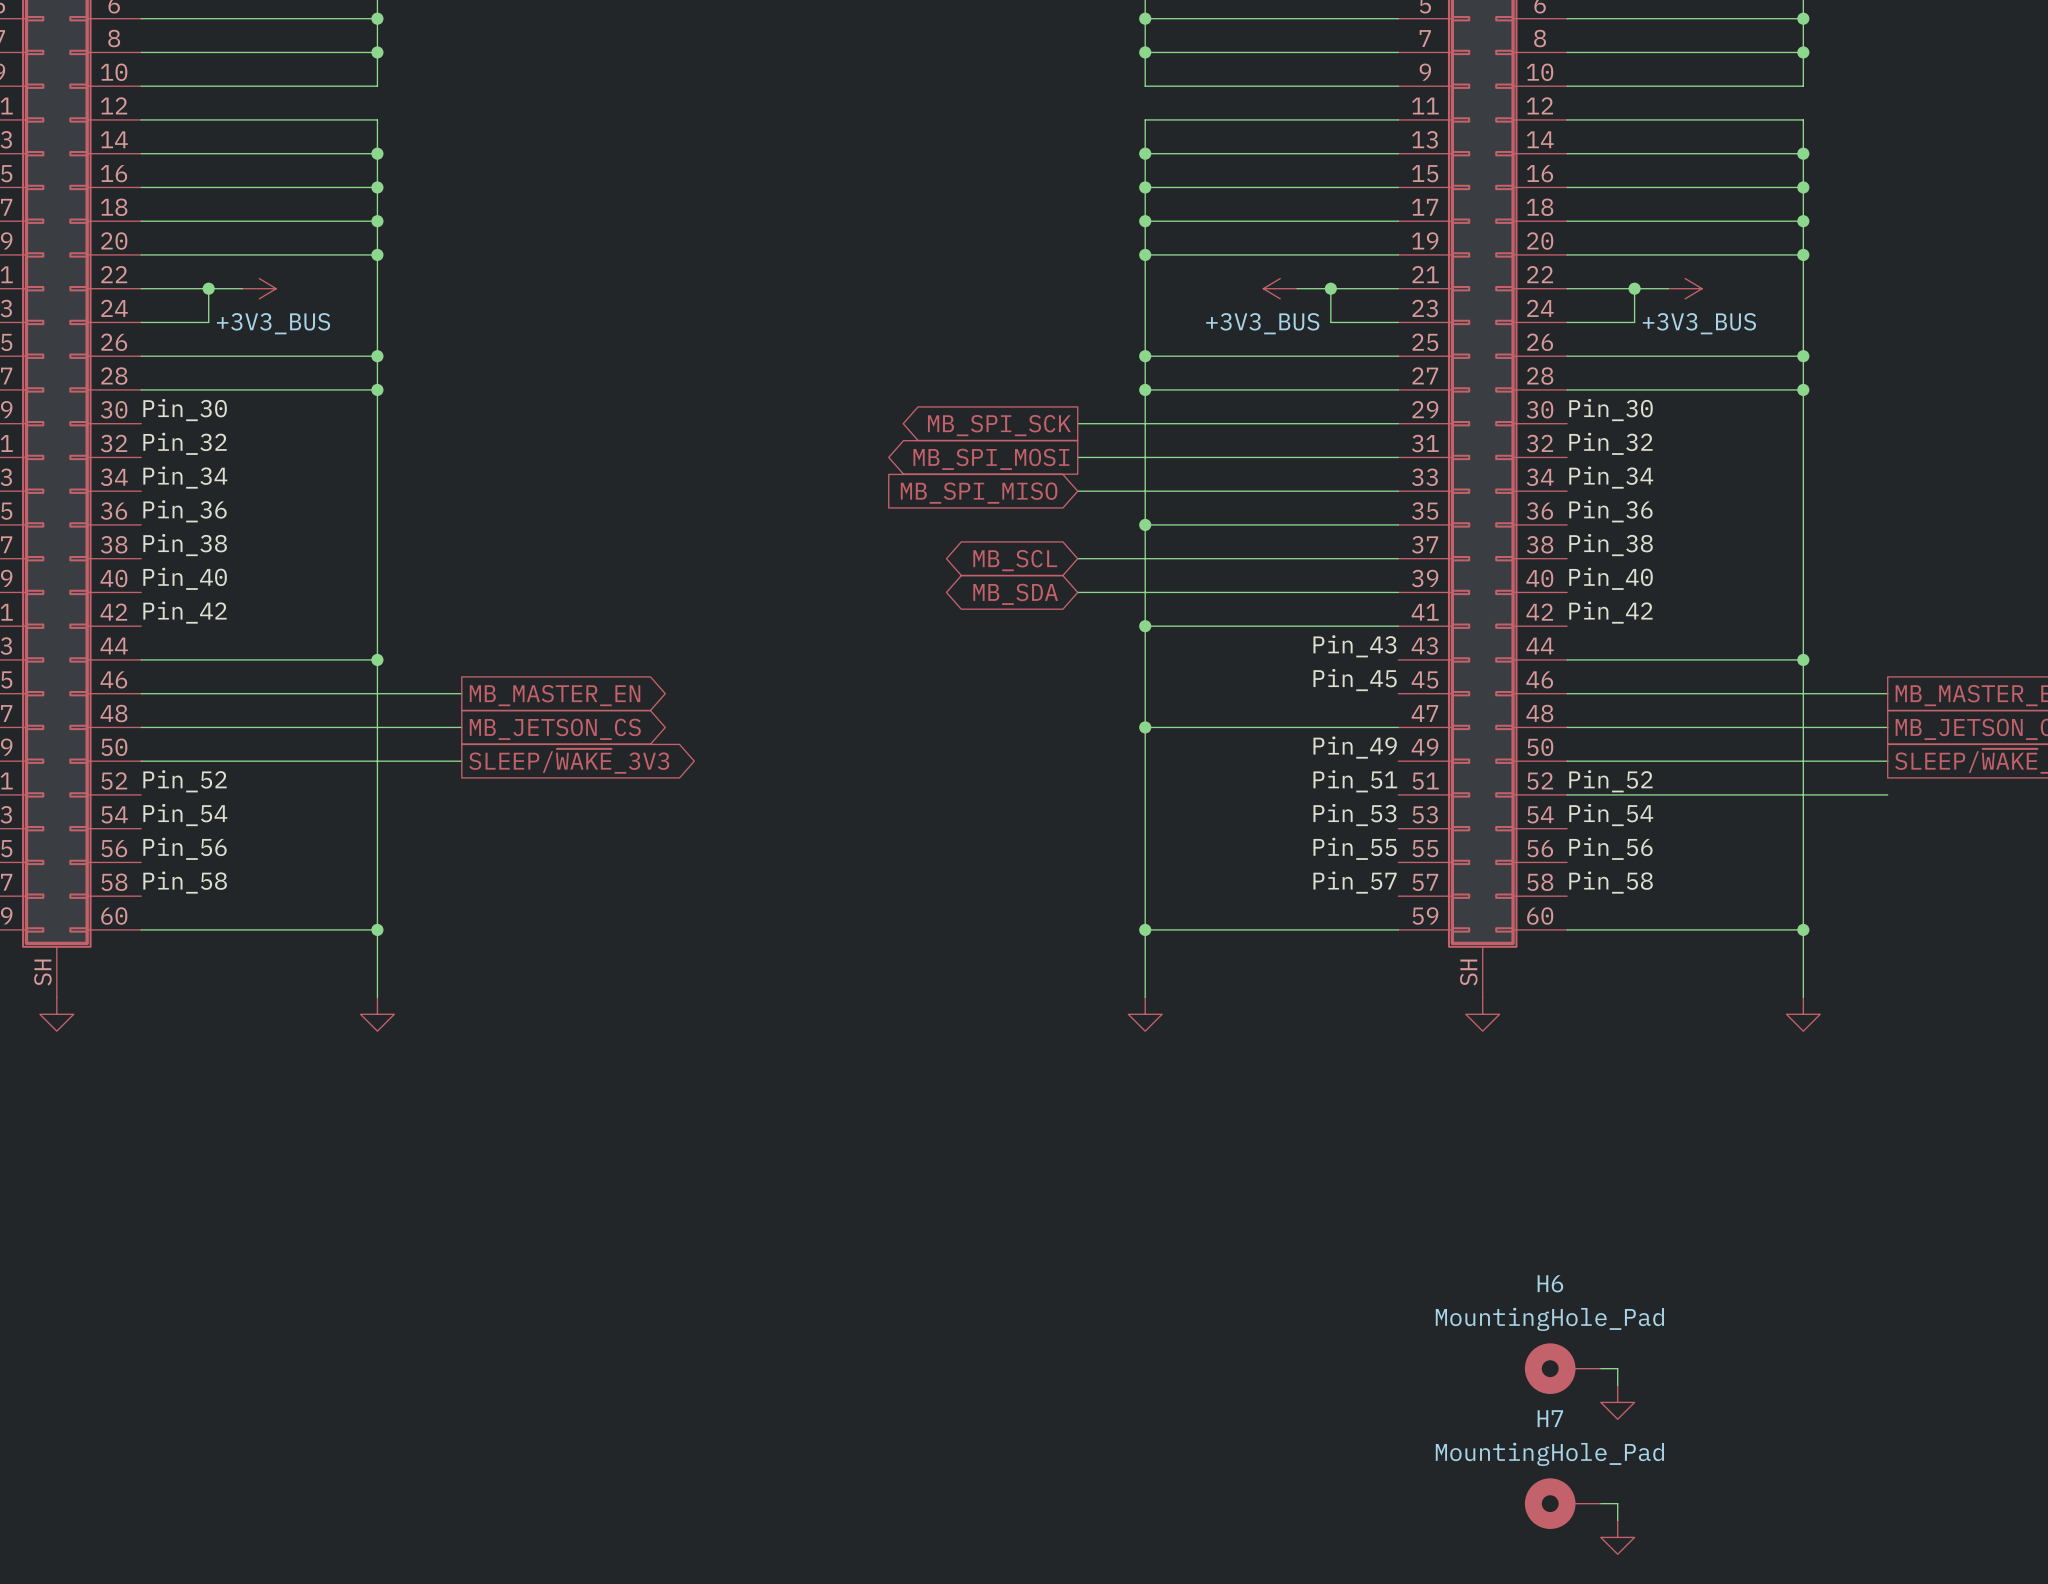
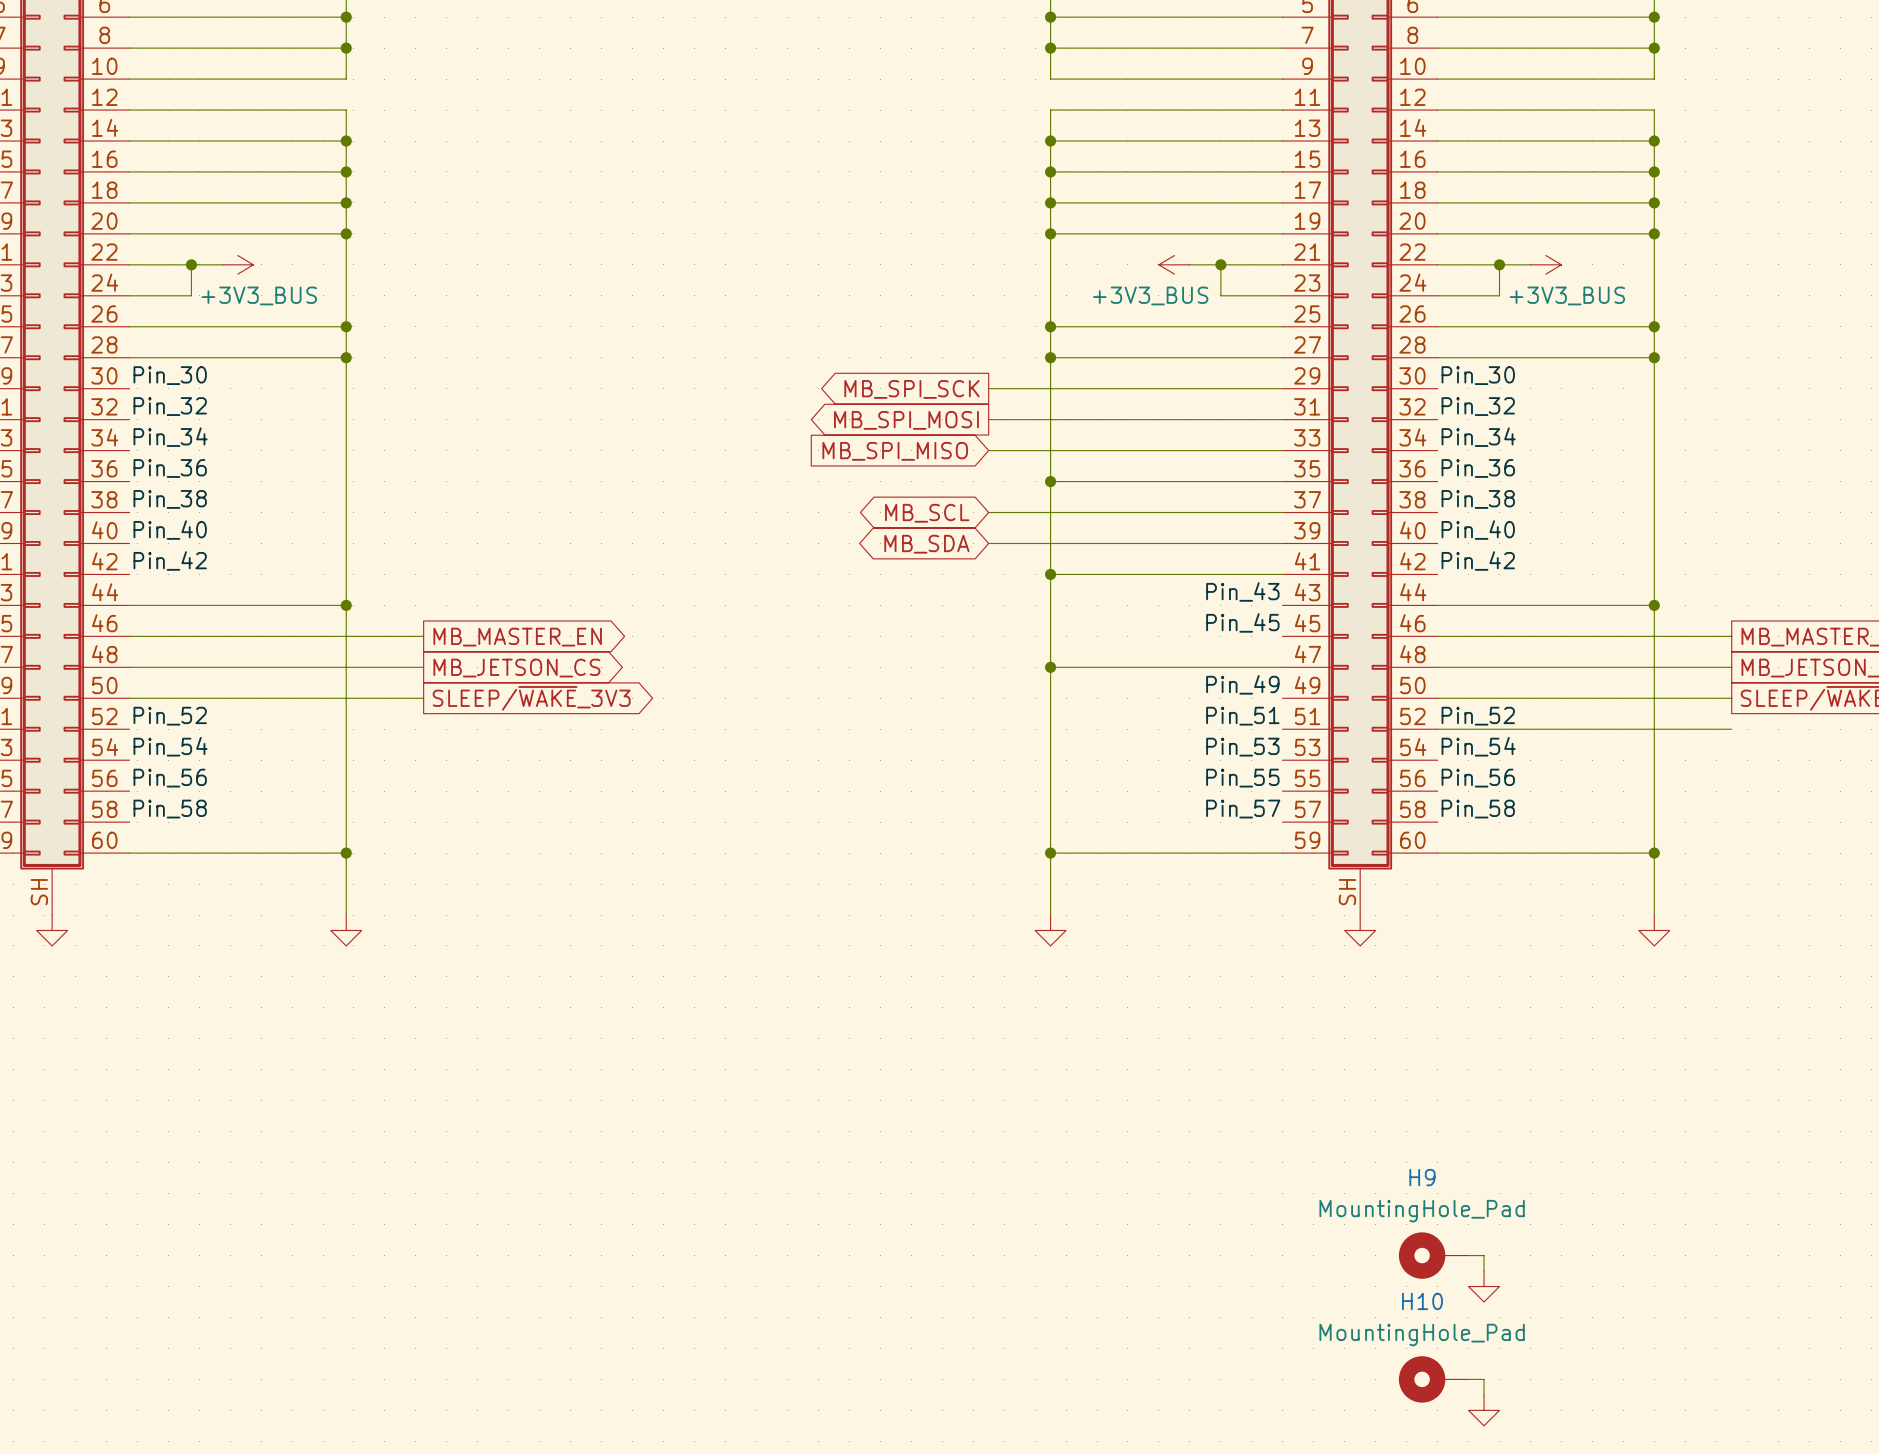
H6 name: H6 (1550, 1283) -> H9 (1422, 1177)
H7 name: H7 (1550, 1418) -> H10 (1422, 1301)

